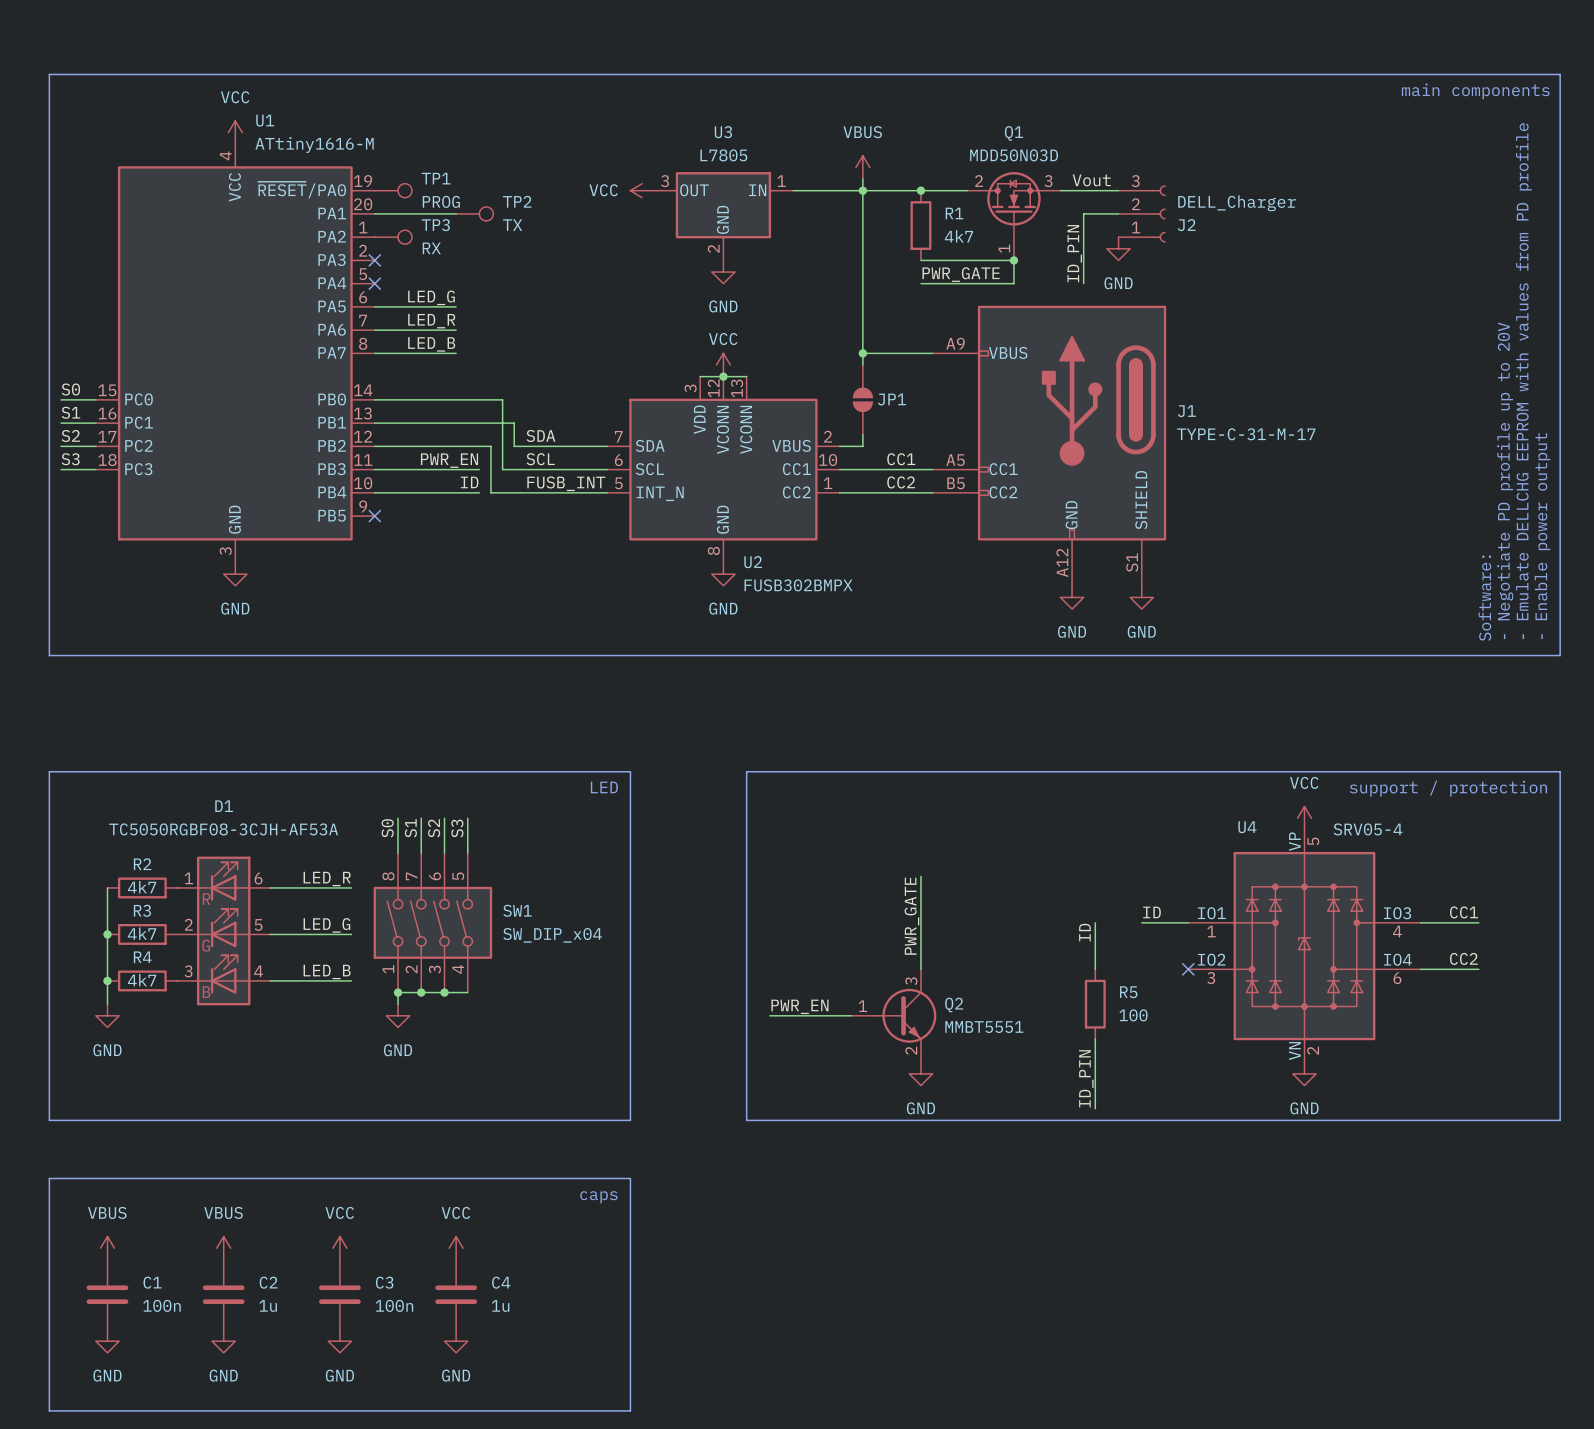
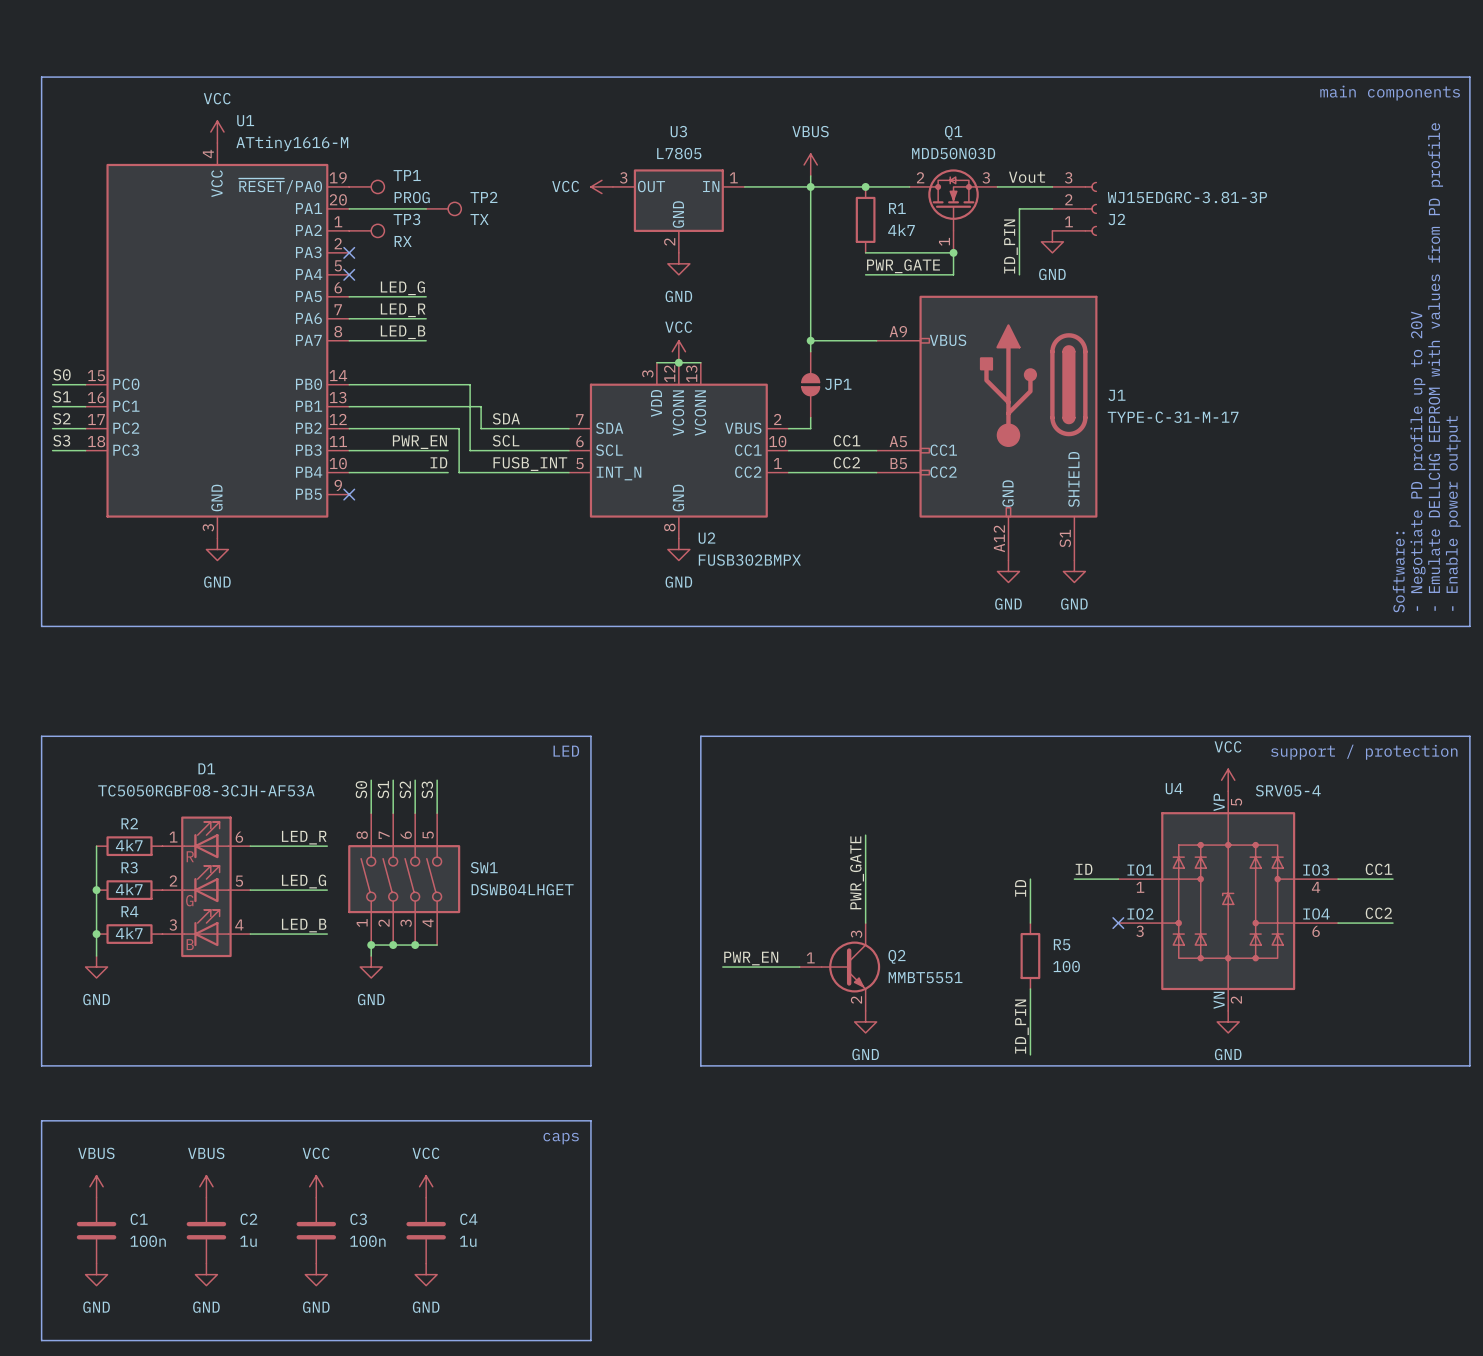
J2 value: DELL_Charger (1237, 203) -> WJ15EDGRC-3.81-3P (1187, 197)
SW1 value: SW_DIP_x04 (552, 935) -> DSWB04LHGET (522, 889)

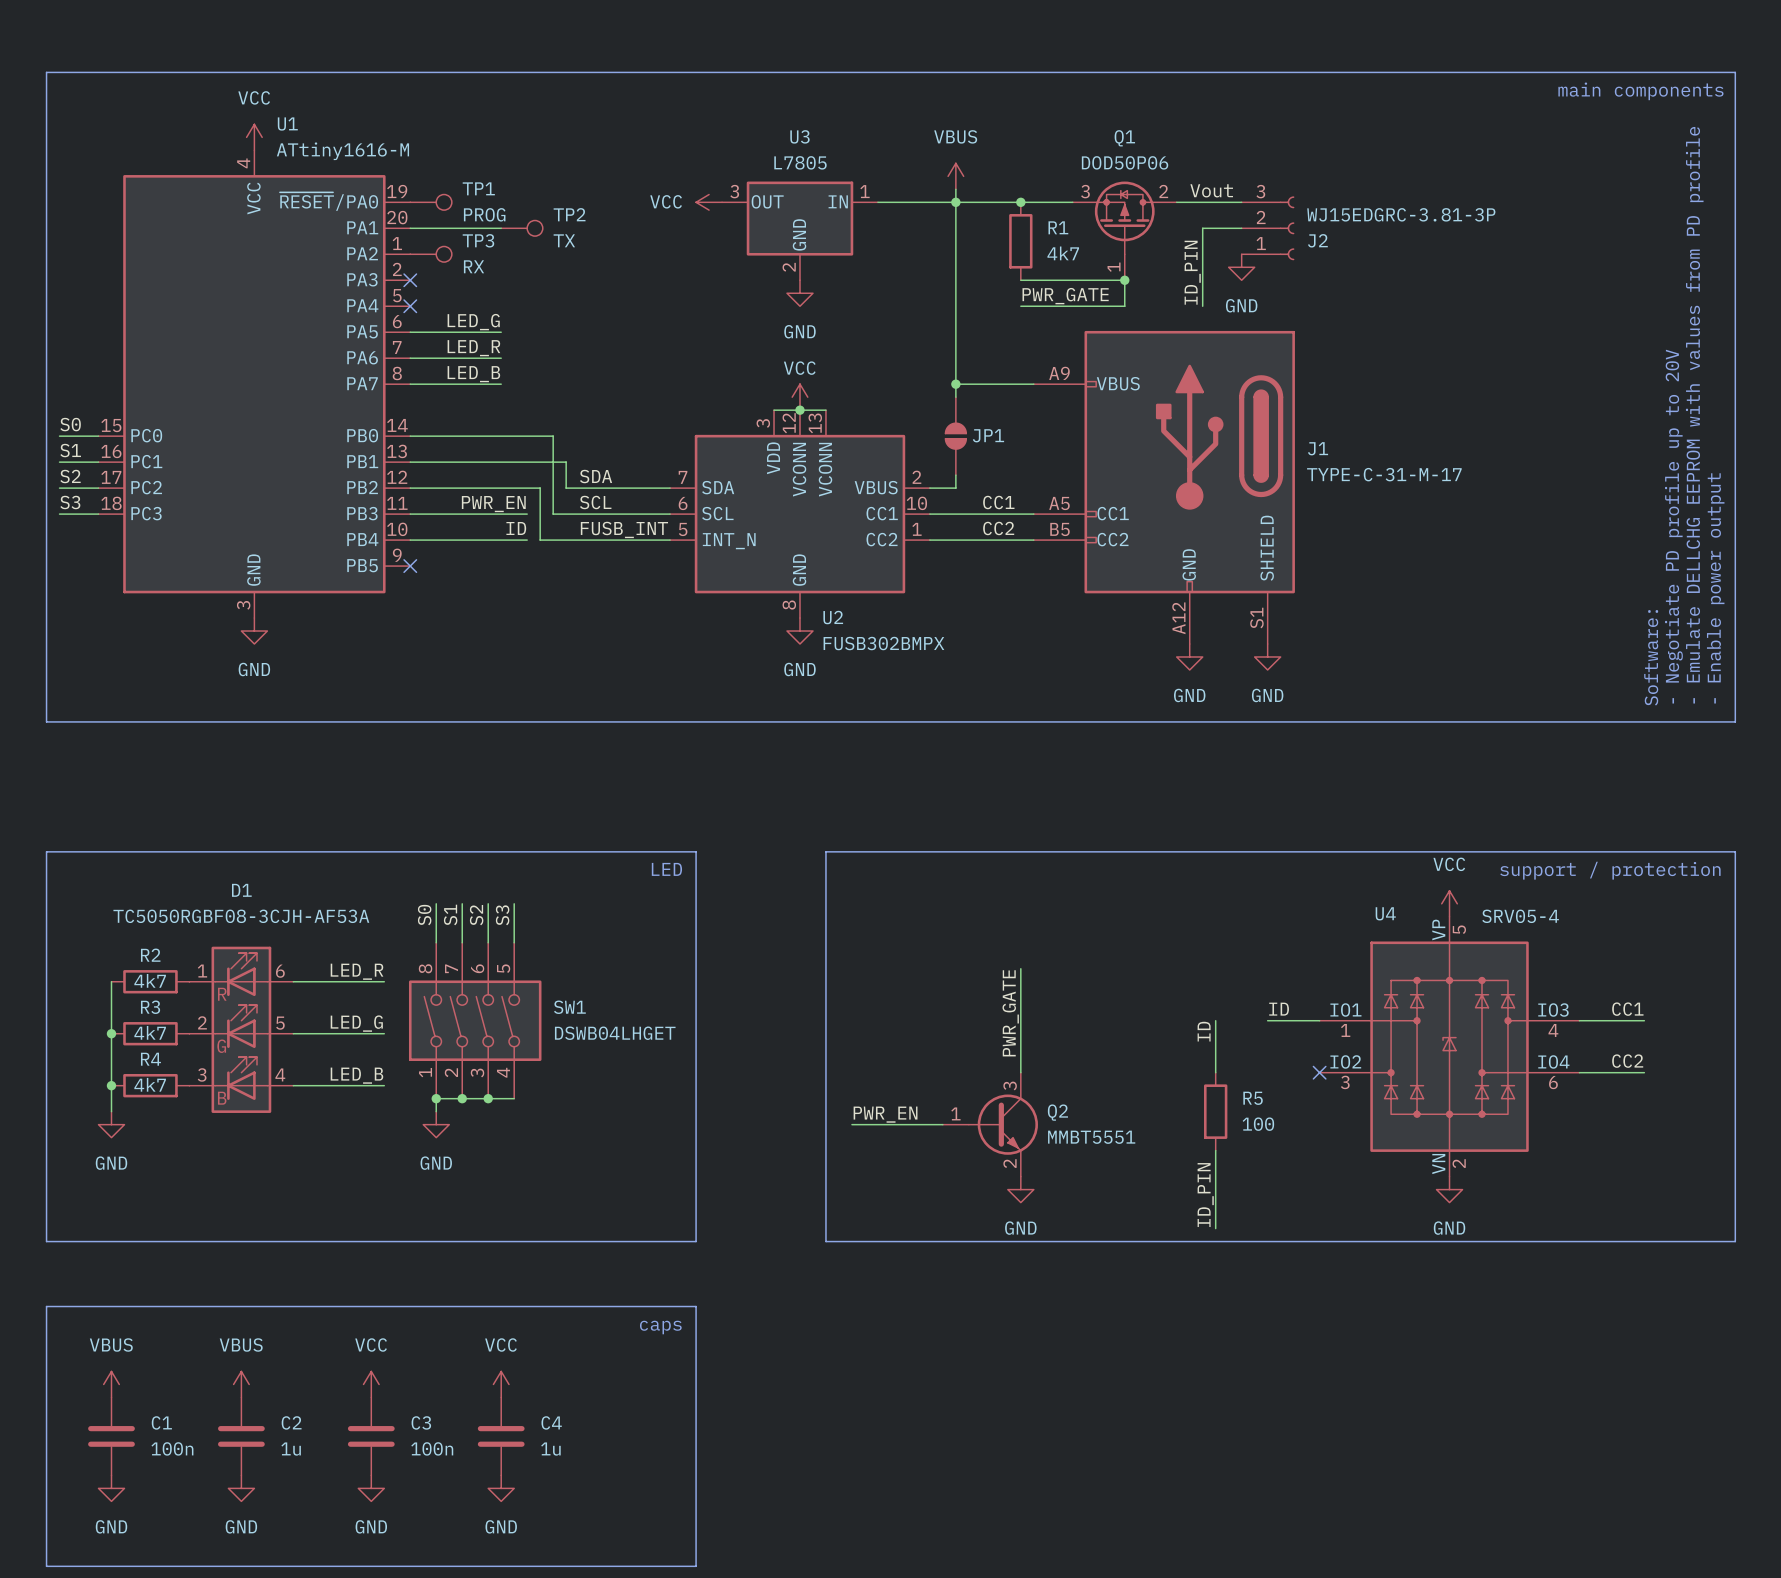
Q1 value: MDD50N03D (953, 153) -> DOD50P06 (1125, 162)
Q1 symbol: [909, 169, 998, 253] -> [1072, 181, 1177, 281]

